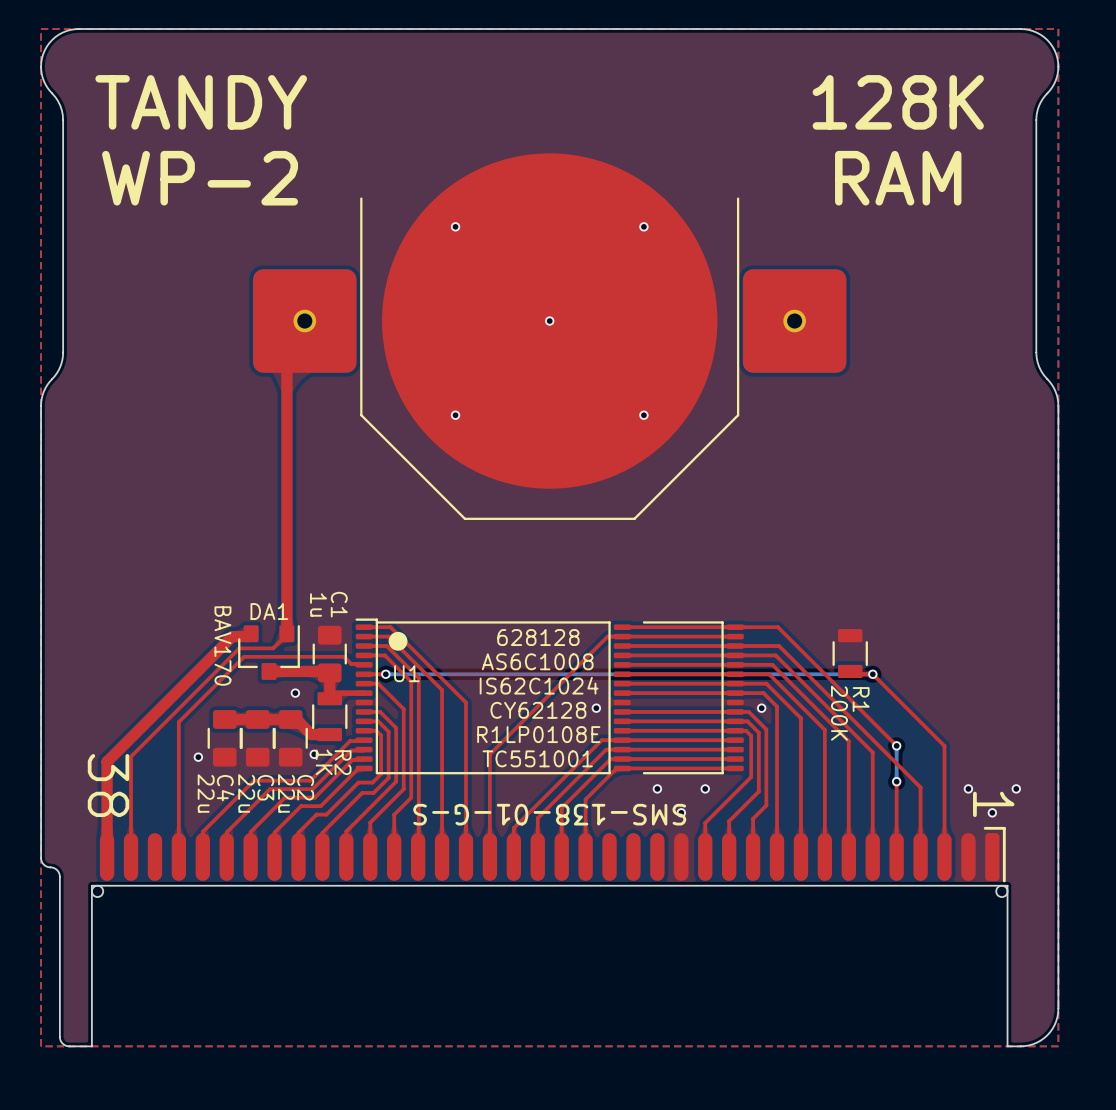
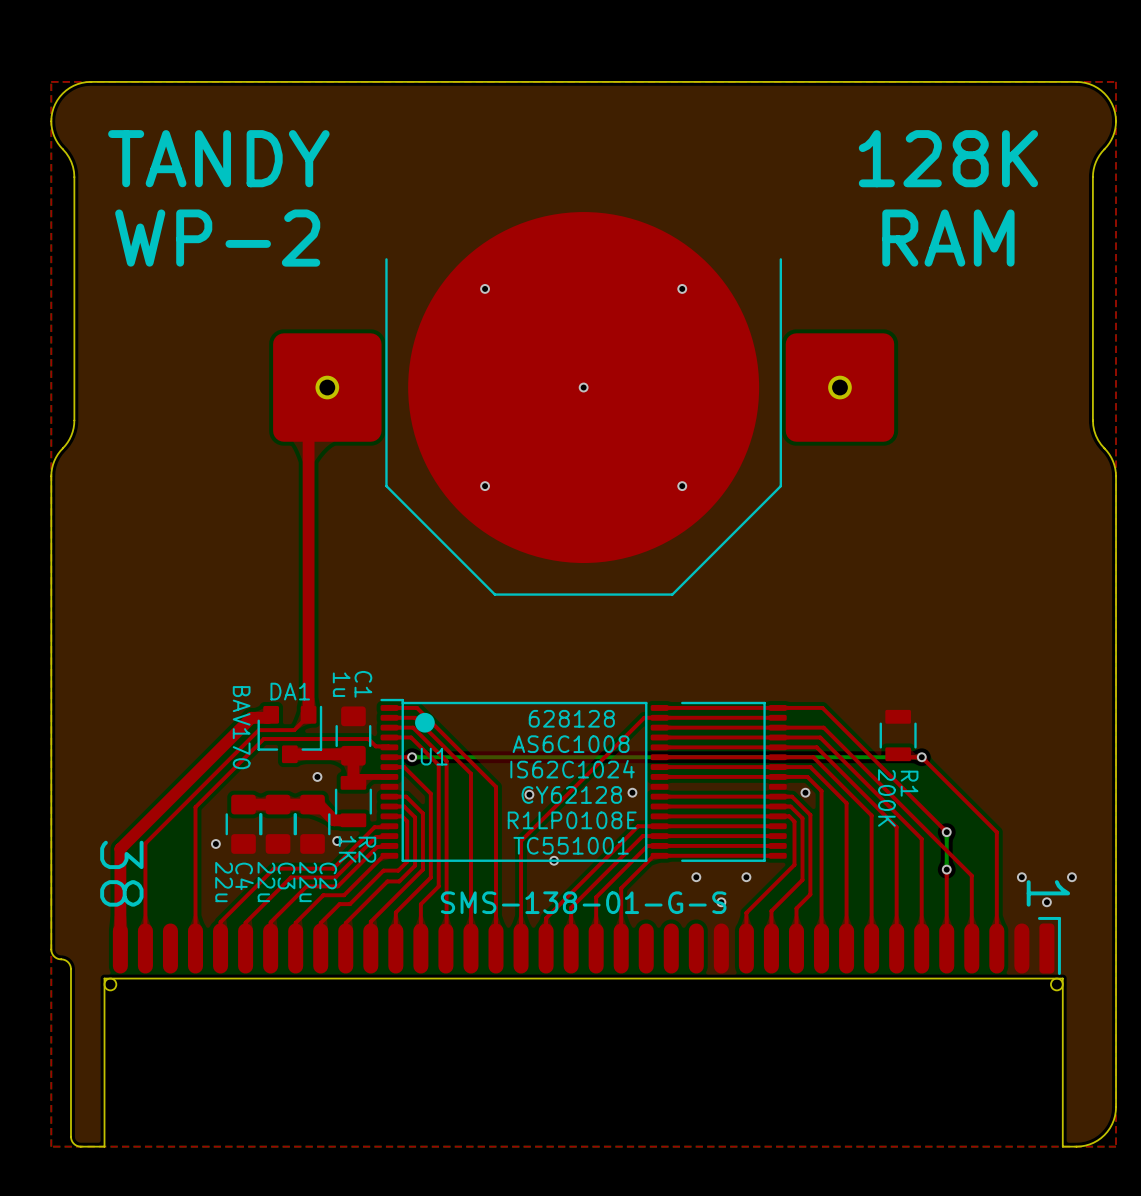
via: none -> (529, 794)
via: none -> (554, 860)
part value rotation: 0° (549, 814) -> 180° (583, 902)

